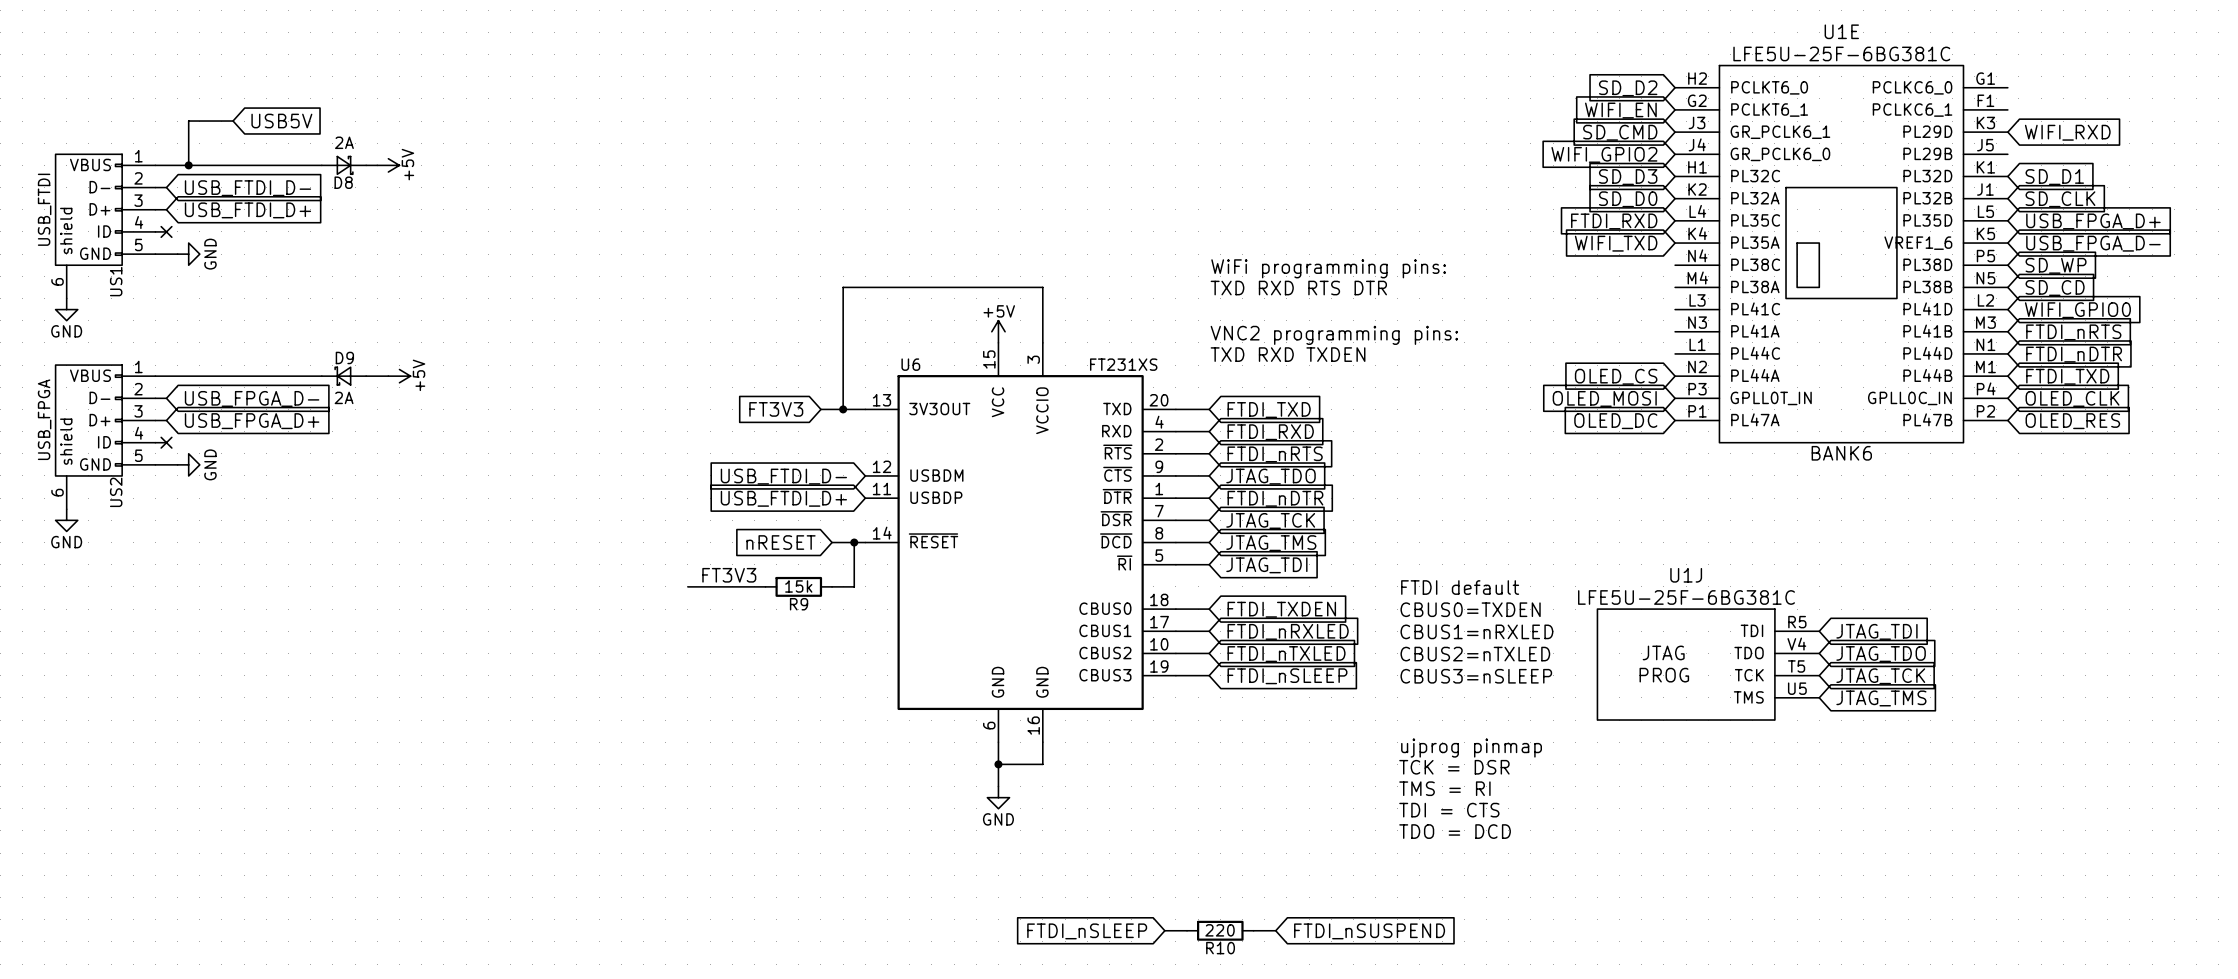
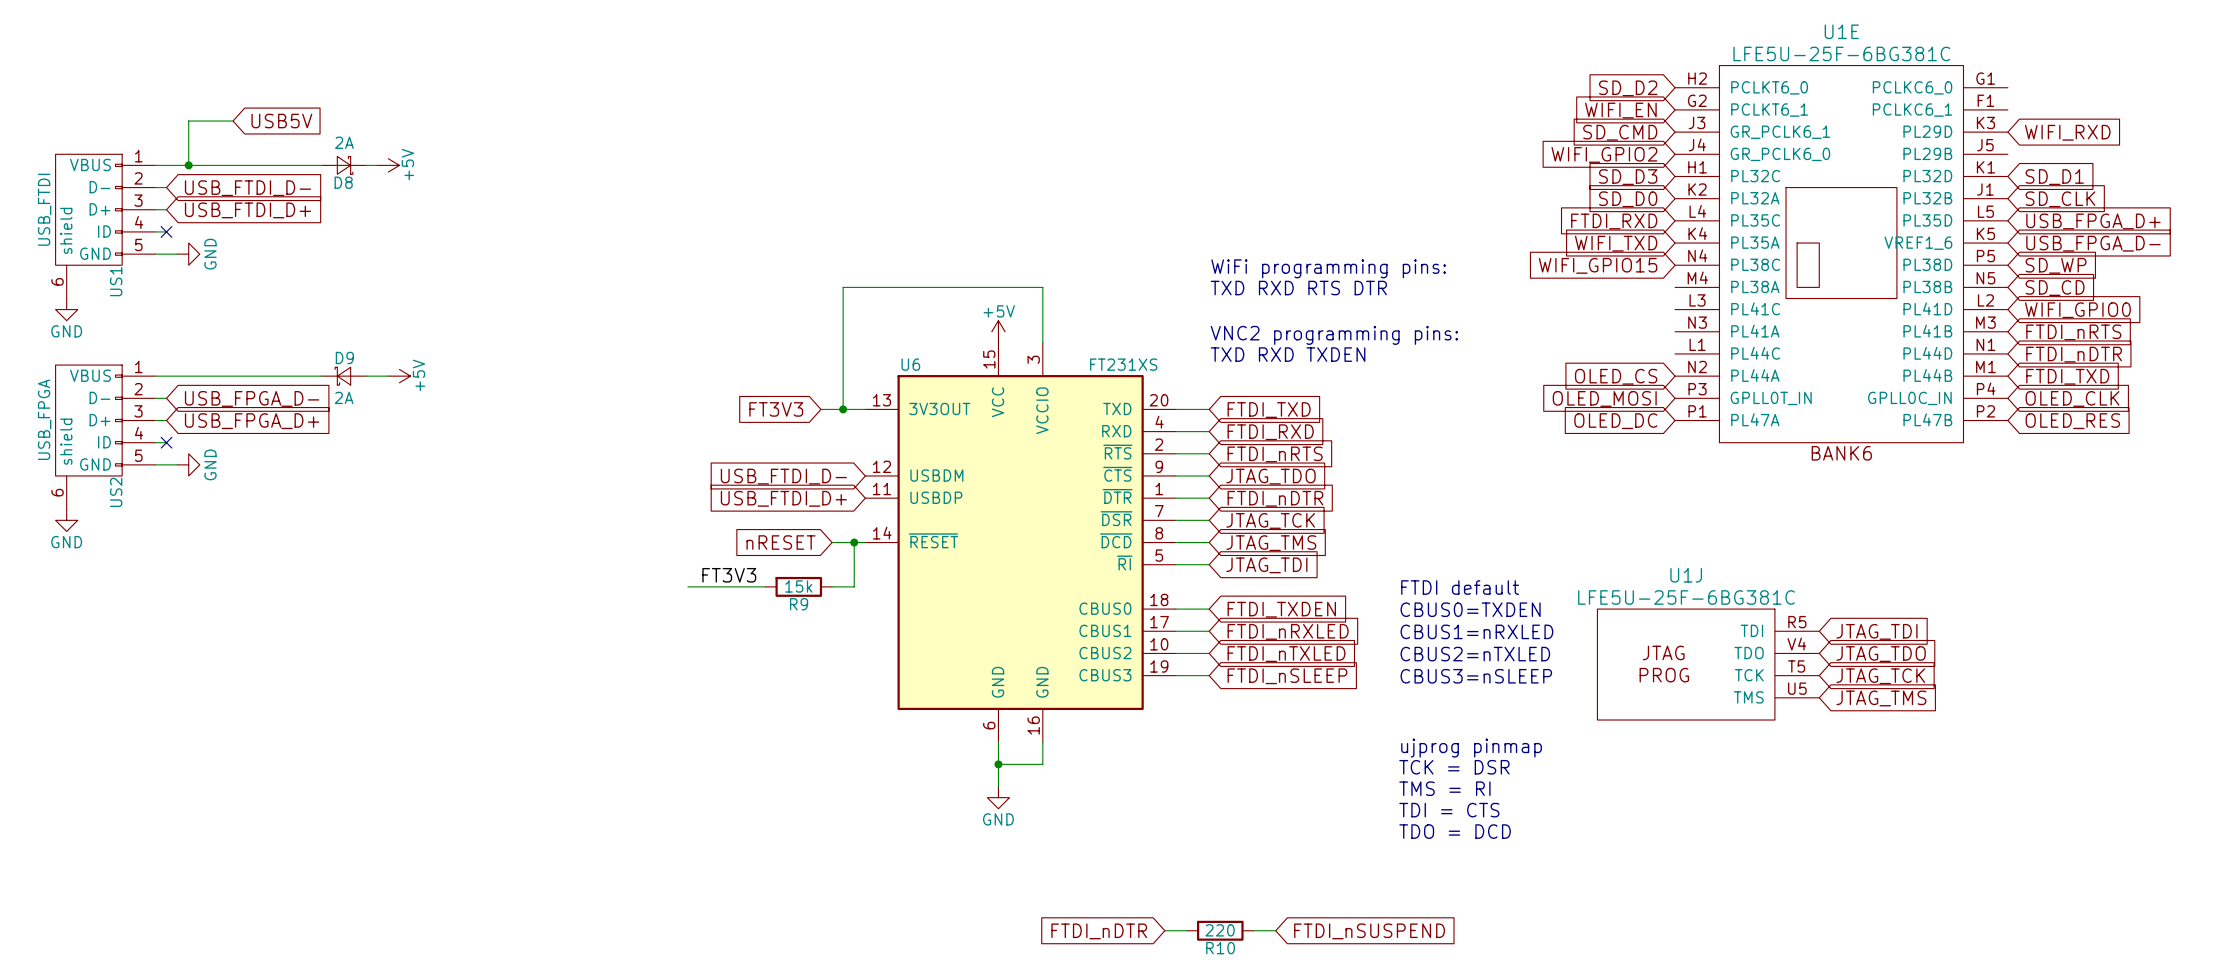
global label: none -> WIFI_GPIO15 (1598, 265)
global label: FTDI_nSLEEP (1087, 931) -> FTDI_nDTR (1099, 931)

